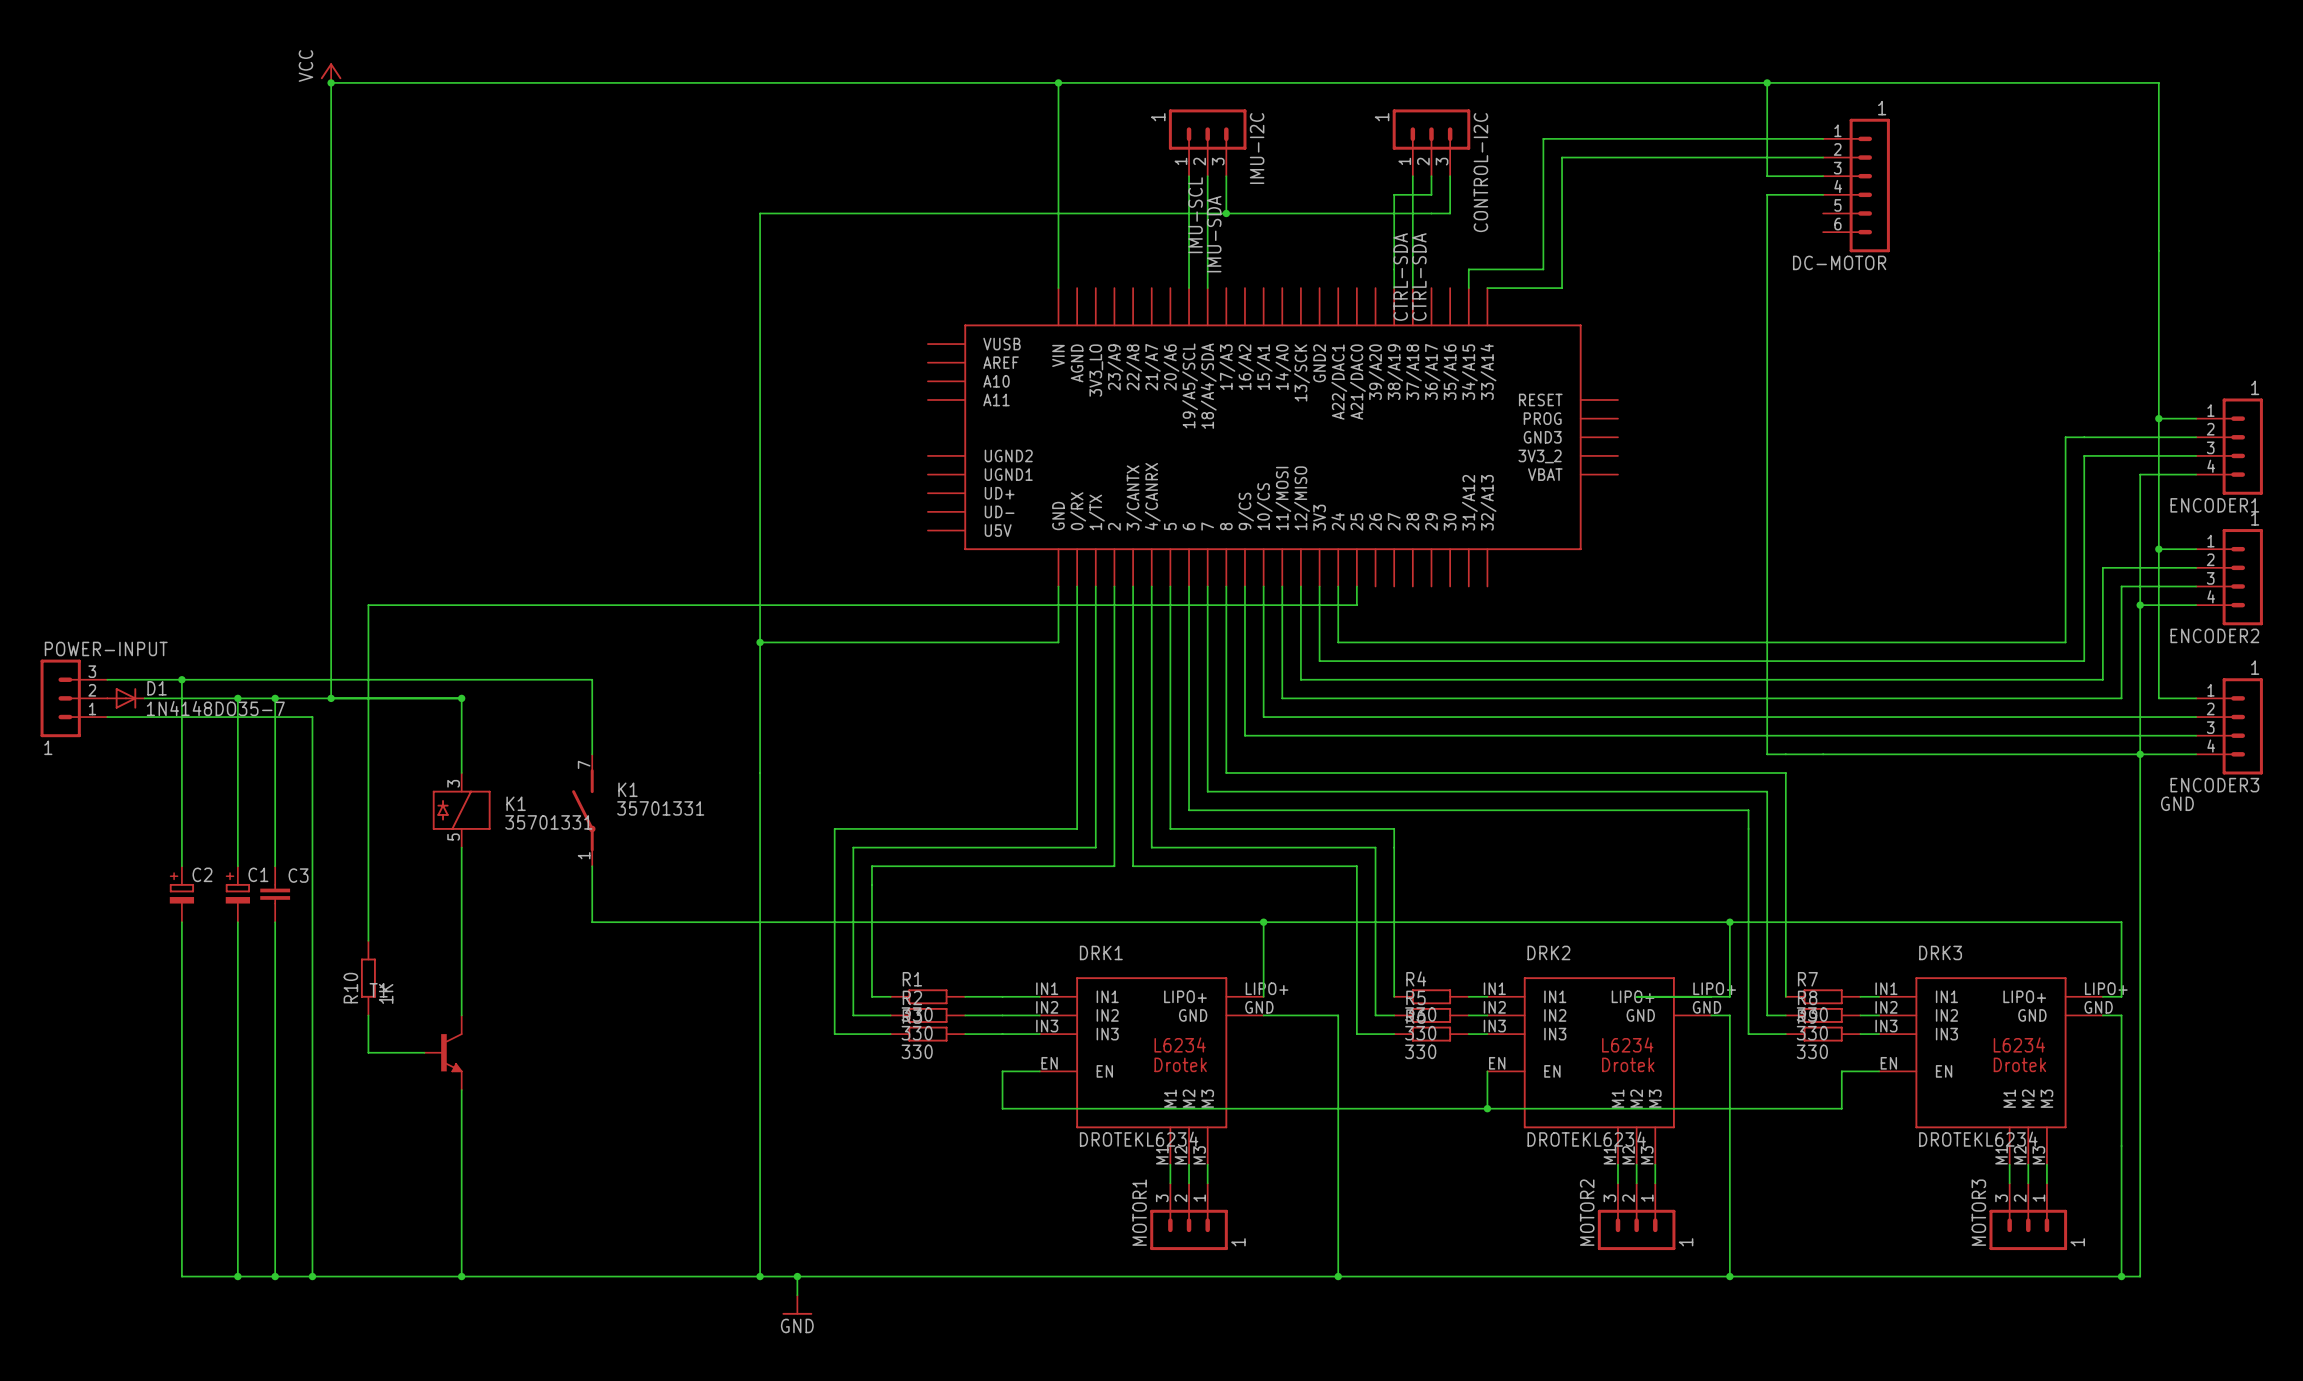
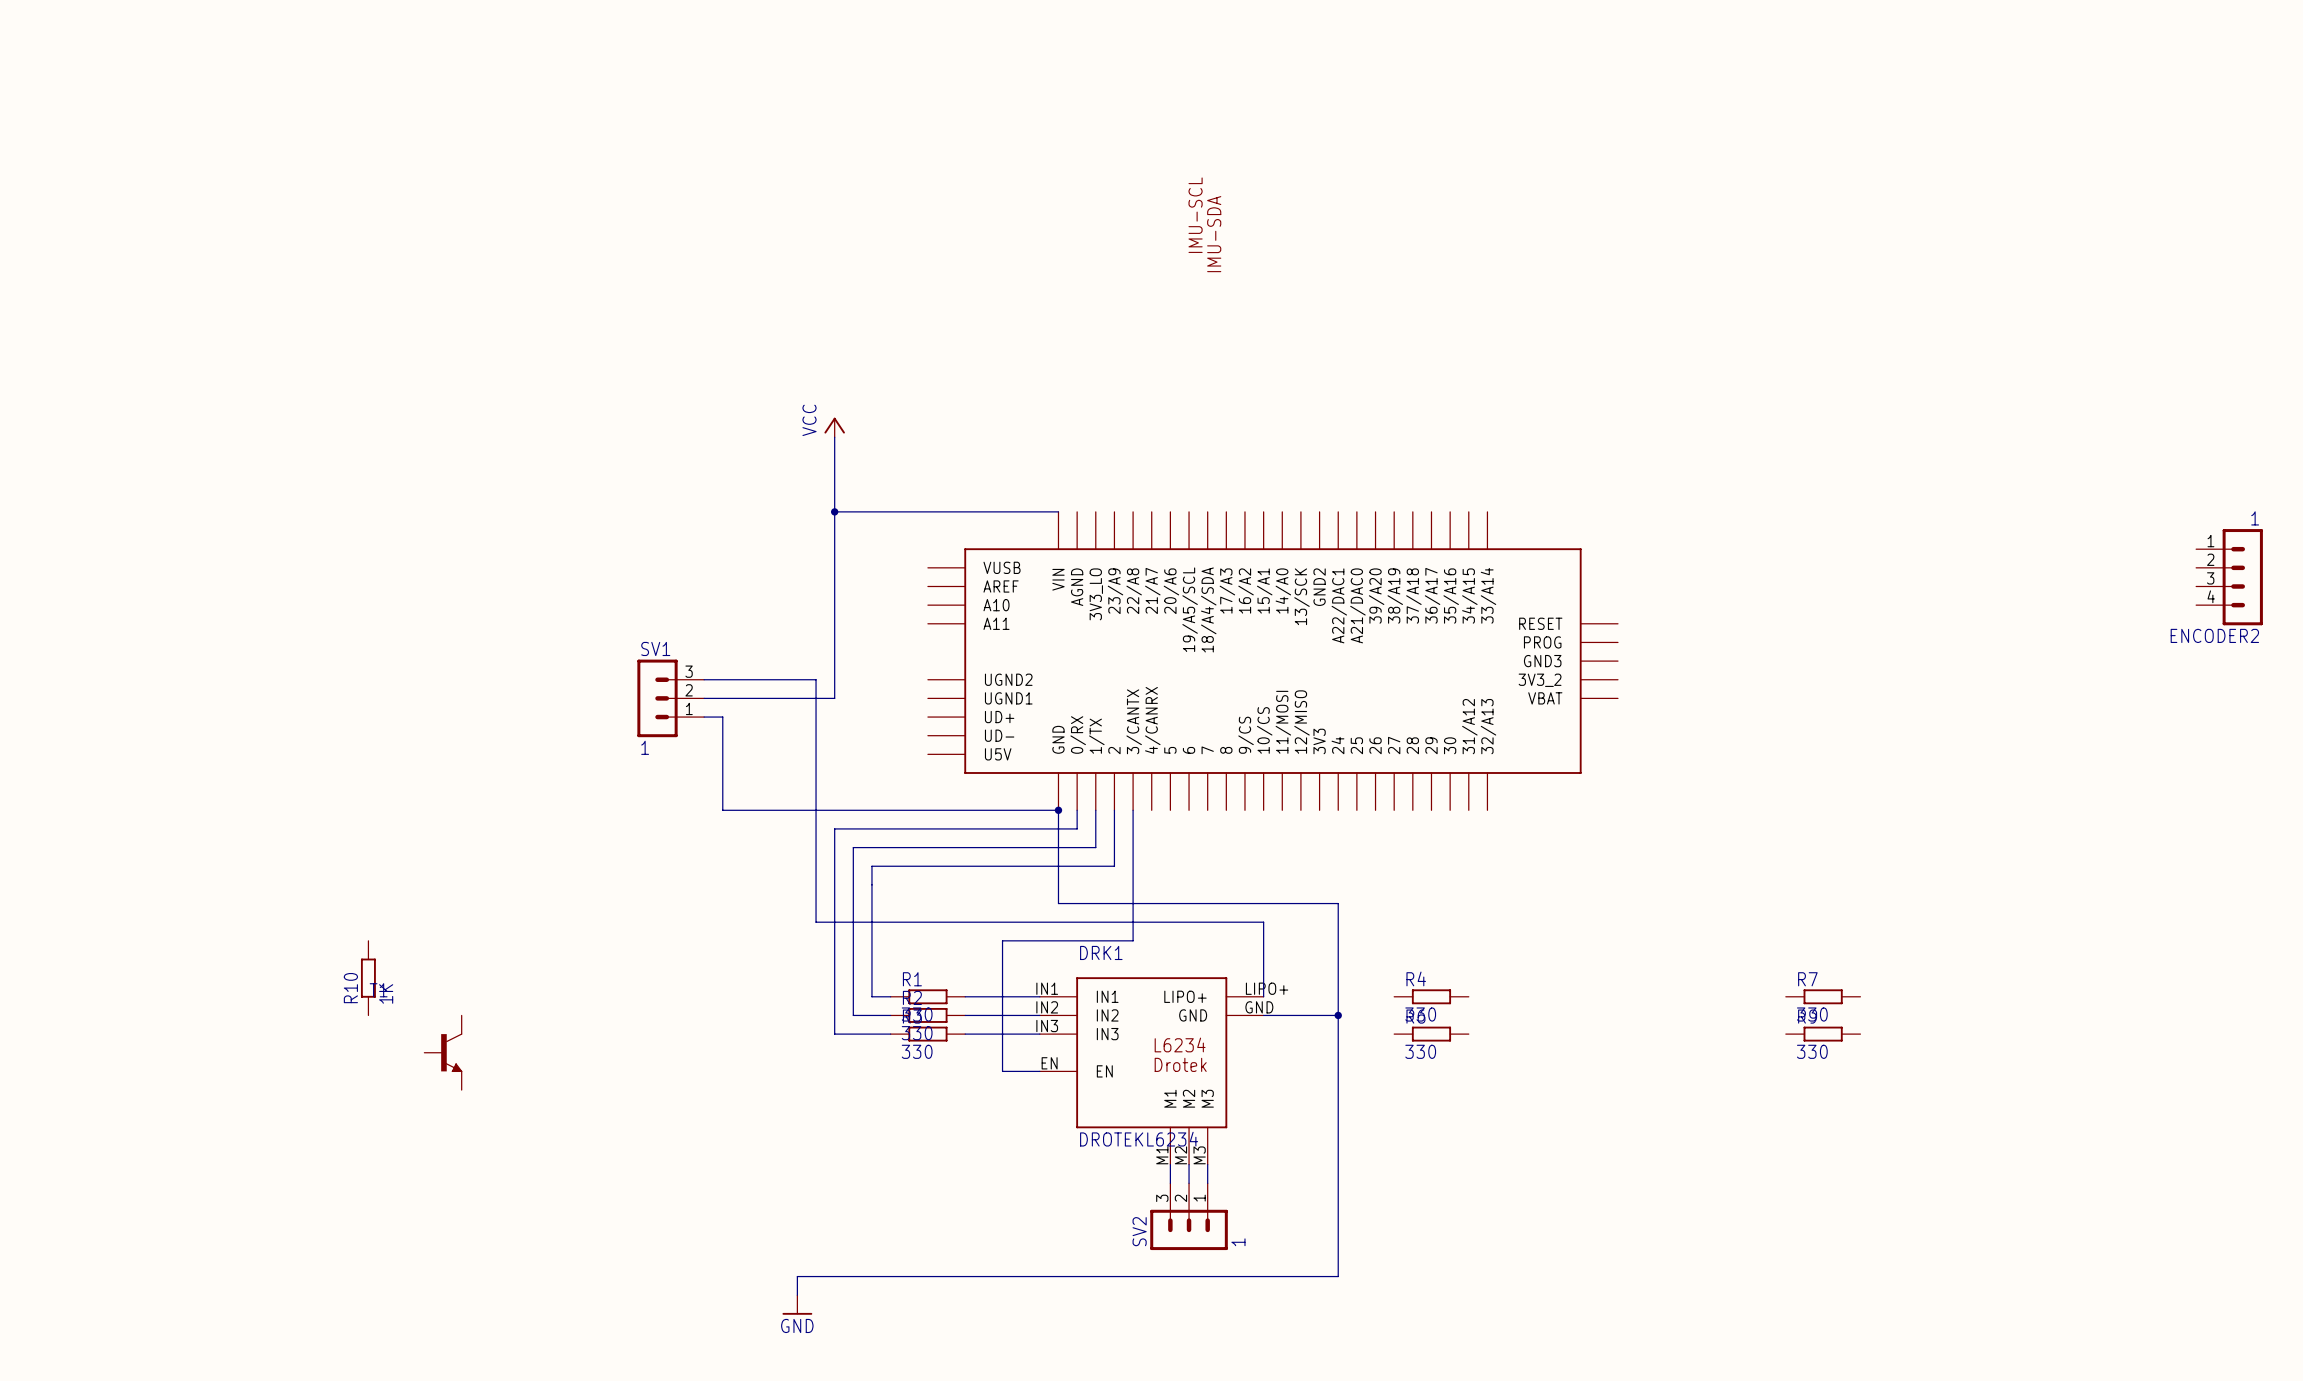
power symbol: VCC (331, 73) -> none
junction: (331, 82) -> none
wire: (1058, 82) (1058, 288) -> none
junction: (1058, 82) -> none
wire: (1767, 82) (1767, 176) (1823, 176) -> none
junction: (1767, 82) -> none
wire: (1823, 138) (1543, 138) (1543, 269) (1468, 269) (1468, 288) -> none
IMU-I2C: 1 (1207, 142) -> none
CONTROL-I2C: 1 (1431, 142) -> none
wire: (1823, 157) (1562, 157) (1562, 288) (1487, 288) -> none
wire: (1189, 176) (1189, 288) -> none
wire: (1207, 176) (1207, 288) -> none
wire: (1226, 176) (1226, 213) -> none
wire: (1412, 176) (1412, 288) -> none
wire: (1431, 176) (1431, 194) (1394, 194) (1394, 288) -> none
wire: (1450, 176) (1450, 213) (760, 213) (760, 1276) -> none
DC-MOTOR: 1 (1856, 185) -> none
wire: (1823, 194) (1767, 194) (1767, 754) (2196, 754) -> none
junction: (1226, 213) -> none
label: CTRL-SDA (1400, 277) -> none
label: CTRL-SDA (1419, 277) -> none
wire: (2158, 418) (2196, 418) -> none
junction: (2158, 418) -> none
power symbol: none -> VCC (834, 427)
wire: none -> (834, 437) (834, 698) (704, 698)
part: (1272, 437) -> none
wire: (2196, 437) (2065, 437) (2065, 642) (1338, 642) (1338, 586) -> none
ENCODER1: 1 (2229, 446) -> none
wire: (2196, 455) (2084, 455) (2084, 661) (1319, 661) (1319, 586) -> none
wire: (2196, 474) (2140, 474) (2140, 1276) (1338, 1276) -> none
wire: none -> (834, 511) (1058, 511)
junction: none -> (834, 511)
wire: (2158, 549) (2196, 549) -> none
junction: (2158, 549) -> none
wire: (2196, 567) (2102, 567) (2102, 679) (1300, 679) (1300, 586) -> none
wire: (1058, 586) (1058, 642) (760, 642) -> none
wire: (1077, 586) (1077, 810) -> none
wire: (1095, 586) (1095, 810) -> none
wire: (1114, 586) (1114, 810) -> none
wire: (1133, 586) (1133, 810) -> none
wire: (1151, 586) (1151, 847) (1375, 847) (1375, 1015) (1394, 1015) -> none
wire: (1170, 586) (1170, 828) (1394, 828) (1394, 996) -> none
wire: (1189, 586) (1189, 810) (1748, 810) (1748, 1034) (1785, 1034) -> none
wire: (1207, 586) (1207, 791) (1767, 791) (1767, 1015) (1785, 1015) -> none
wire: (1226, 586) (1226, 772) (1785, 772) (1785, 996) -> none
wire: (1244, 586) (1244, 735) (2196, 735) -> none
wire: (1263, 586) (1263, 717) (2196, 717) -> none
wire: (1282, 586) (1282, 698) (2121, 698) (2121, 586) (2196, 586) -> none
wire: (1356, 586) (1356, 605) (368, 605) (368, 940) -> none
wire: (2140, 605) (2196, 605) -> none
junction: (2140, 605) -> none
junction: (760, 642) -> none
part: none -> (1272, 661)
wire: (107, 679) (592, 679) (592, 754) -> none
wire: (181, 679) (181, 866) -> none
junction: (181, 679) -> none
POWER-INPUT: 1 (73, 698) -> none
D1: 1N4148DO35-7 (125, 698) -> none
wire: (144, 698) (461, 698) (461, 772) -> none
wire: (237, 698) (237, 866) -> none
junction: (237, 698) -> none
wire: (275, 698) (275, 866) -> none
junction: (275, 698) -> none
wire: (331, 698) (331, 82) (2158, 82) (2158, 698) (2196, 698) -> none
junction: (331, 698) -> none
junction: (461, 698) -> none
SV1: none -> 1 (670, 698)
wire: (107, 717) (312, 717) (312, 1276) -> none
wire: none -> (704, 717) (722, 717) (722, 810) (1058, 810) (1058, 903) (1338, 903) (1338, 1015)
ENCODER3: 1 (2229, 726) -> none
junction: (2140, 754) -> none
label: GND (2177, 803) -> none
K1: 35701331 (461, 810) -> none
K1: 35701331 (583, 810) -> none
junction: none -> (1058, 810)
wire: (461, 847) (461, 1015) -> none
wire: (592, 866) (592, 922) (816, 922) -> (704, 679) (816, 679) (816, 922)
wire: (1133, 866) (1356, 866) (1356, 1034) (1394, 1034) -> (1133, 866) (1133, 940) (1002, 940) (1002, 1071)
C2: (181, 894) -> none
C1: (237, 894) -> none
C3: (275, 894) -> none
wire: (181, 922) (181, 1276) (797, 1276) -> none
wire: (237, 922) (237, 1276) -> none
wire: (275, 922) (275, 1276) -> none
wire: (1263, 922) (2121, 922) (2121, 996) (2102, 996) -> none
junction: (1263, 922) -> none
wire: (1729, 922) (1729, 996) (1636, 996) -> none
junction: (1729, 922) -> none
wire: (1468, 996) (1487, 996) -> none
wire: (1860, 996) (1879, 996) -> none
wire: (368, 1015) (368, 1052) (424, 1052) -> none
junction: none -> (1338, 1015)
R5: 330 (1431, 1015) -> none
wire: (1468, 1015) (1487, 1015) -> none
wire: (1711, 1015) (1729, 1015) (1729, 1276) -> none
R8: 330 (1823, 1015) -> none
wire: (1860, 1015) (1879, 1015) -> none
wire: (2102, 1015) (2121, 1015) (2121, 1276) -> none
wire: (1468, 1034) (1487, 1034) -> none
wire: (1860, 1034) (1879, 1034) -> none
DRK2: DROTEKL6234 (1599, 1070) -> none
DRK3: DROTEKL6234 (1990, 1070) -> none
wire: (1002, 1071) (1002, 1108) (1841, 1108) (1841, 1071) (1879, 1071) -> none
wire: (1487, 1071) (1487, 1108) -> none
wire: (461, 1090) (461, 1276) -> none
junction: (1487, 1108) -> none
wire: (1617, 1164) (1617, 1183) -> none
wire: (1636, 1164) (1636, 1183) -> none
wire: (1655, 1164) (1655, 1183) -> none
wire: (2009, 1164) (2009, 1183) -> none
wire: (2028, 1164) (2028, 1183) -> none
wire: (2046, 1164) (2046, 1183) -> none
MOTOR1 name: MOTOR1 (1139, 1212) -> SV2 (1139, 1231)
MOTOR2: 1 (1636, 1216) -> none
MOTOR3: 1 (2028, 1216) -> none
junction: (237, 1276) -> none
junction: (275, 1276) -> none
junction: (312, 1276) -> none
junction: (461, 1276) -> none
junction: (760, 1276) -> none
junction: (797, 1276) -> none
junction: (1338, 1276) -> none
junction: (1729, 1276) -> none
junction: (2121, 1276) -> none

